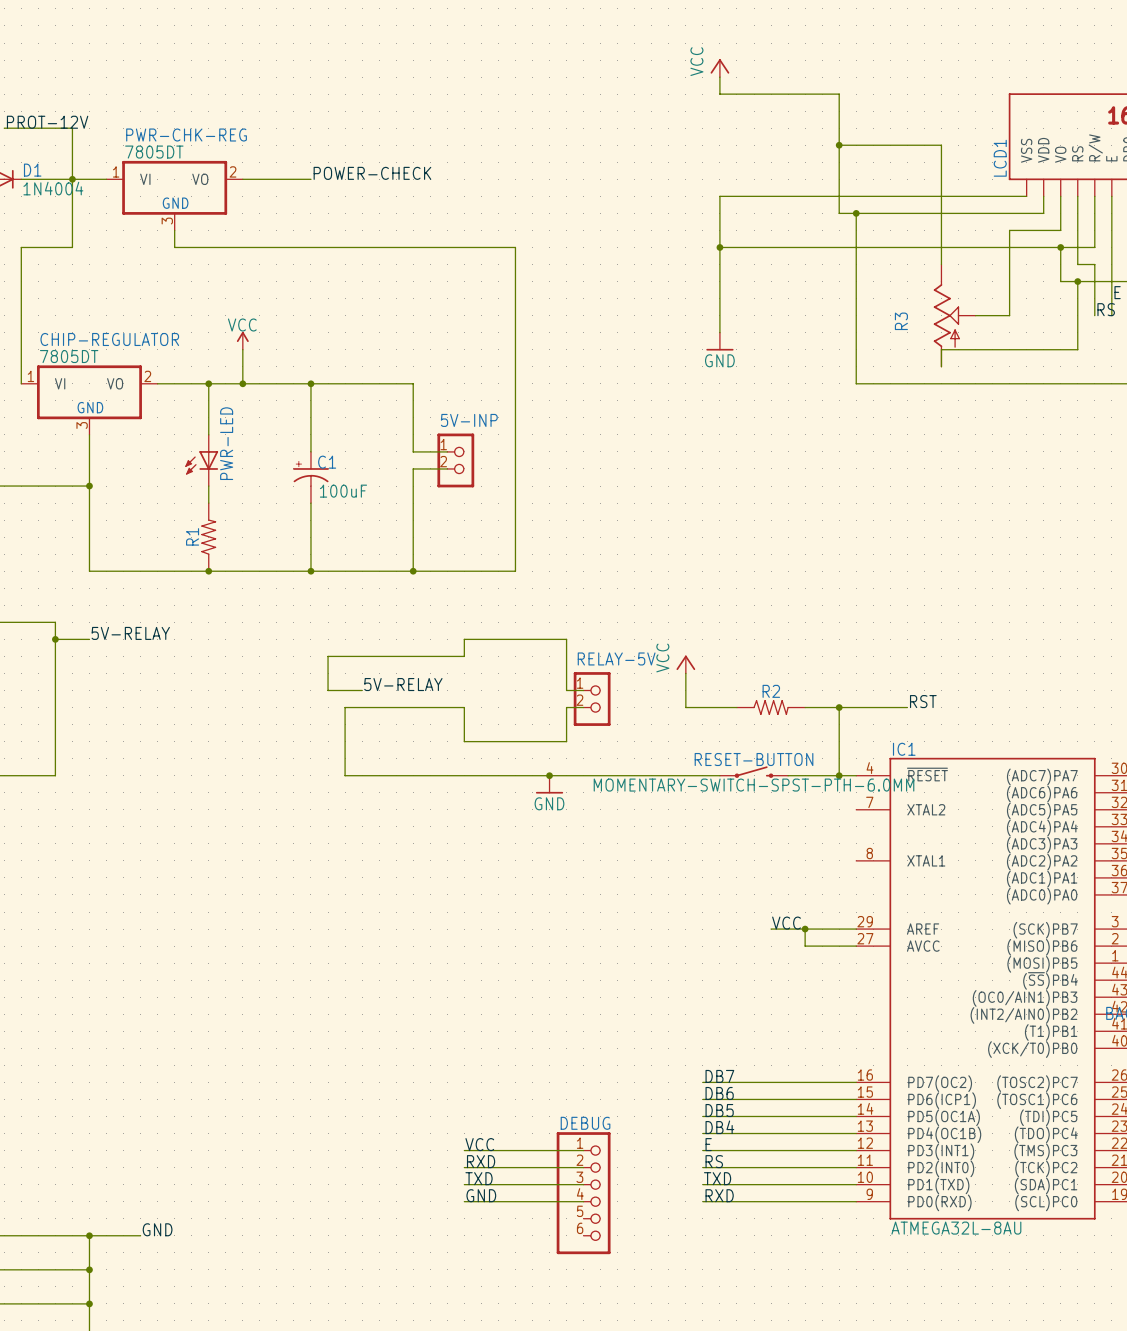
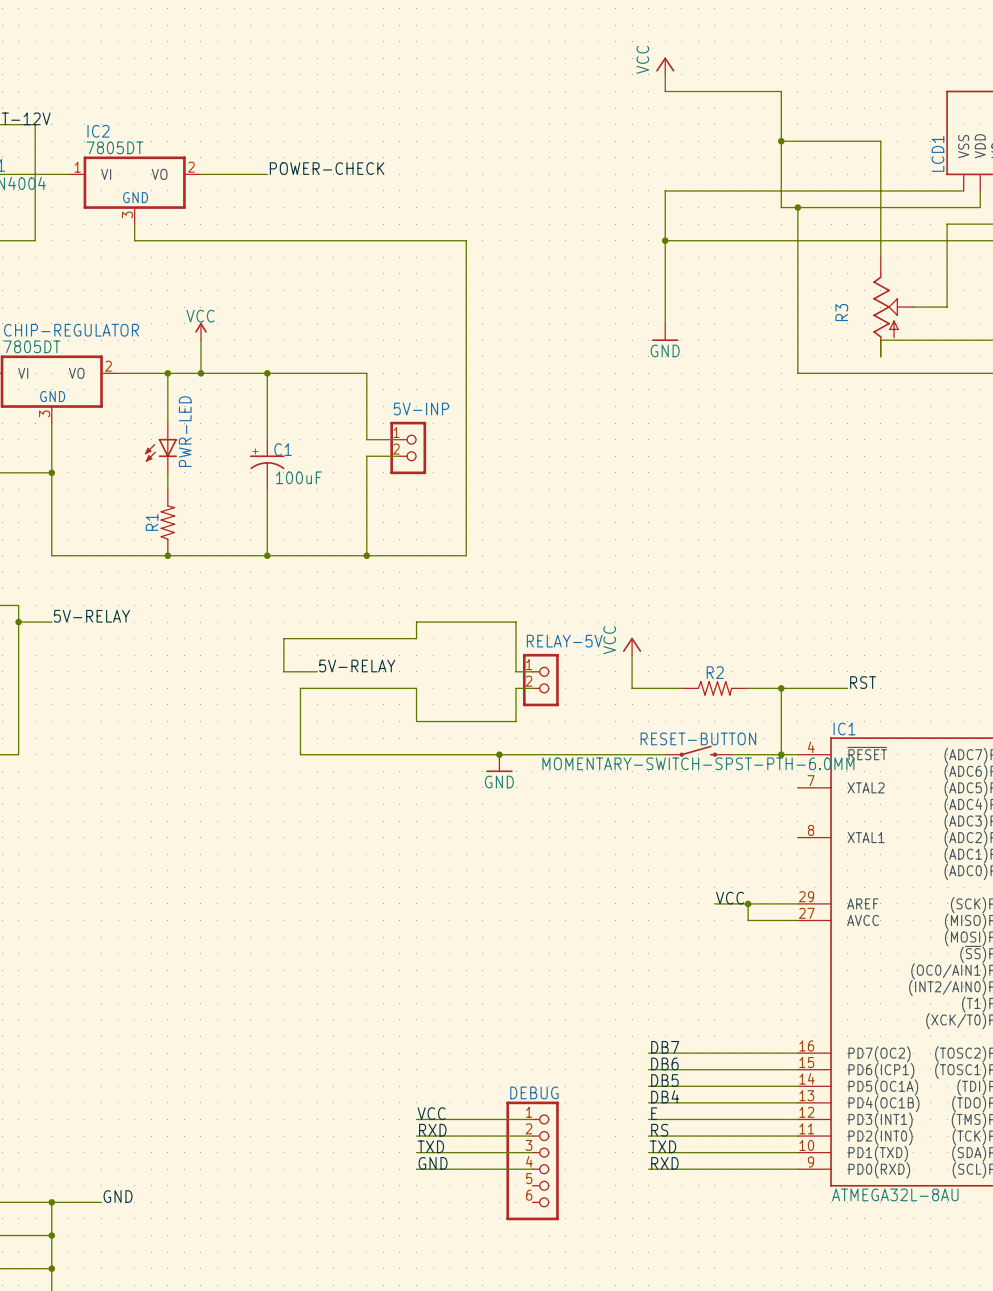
PWR-CHK-REG name: PWR-CHK-REG (186, 135) -> IC2 (98, 131)
junction: (72, 179) -> none

